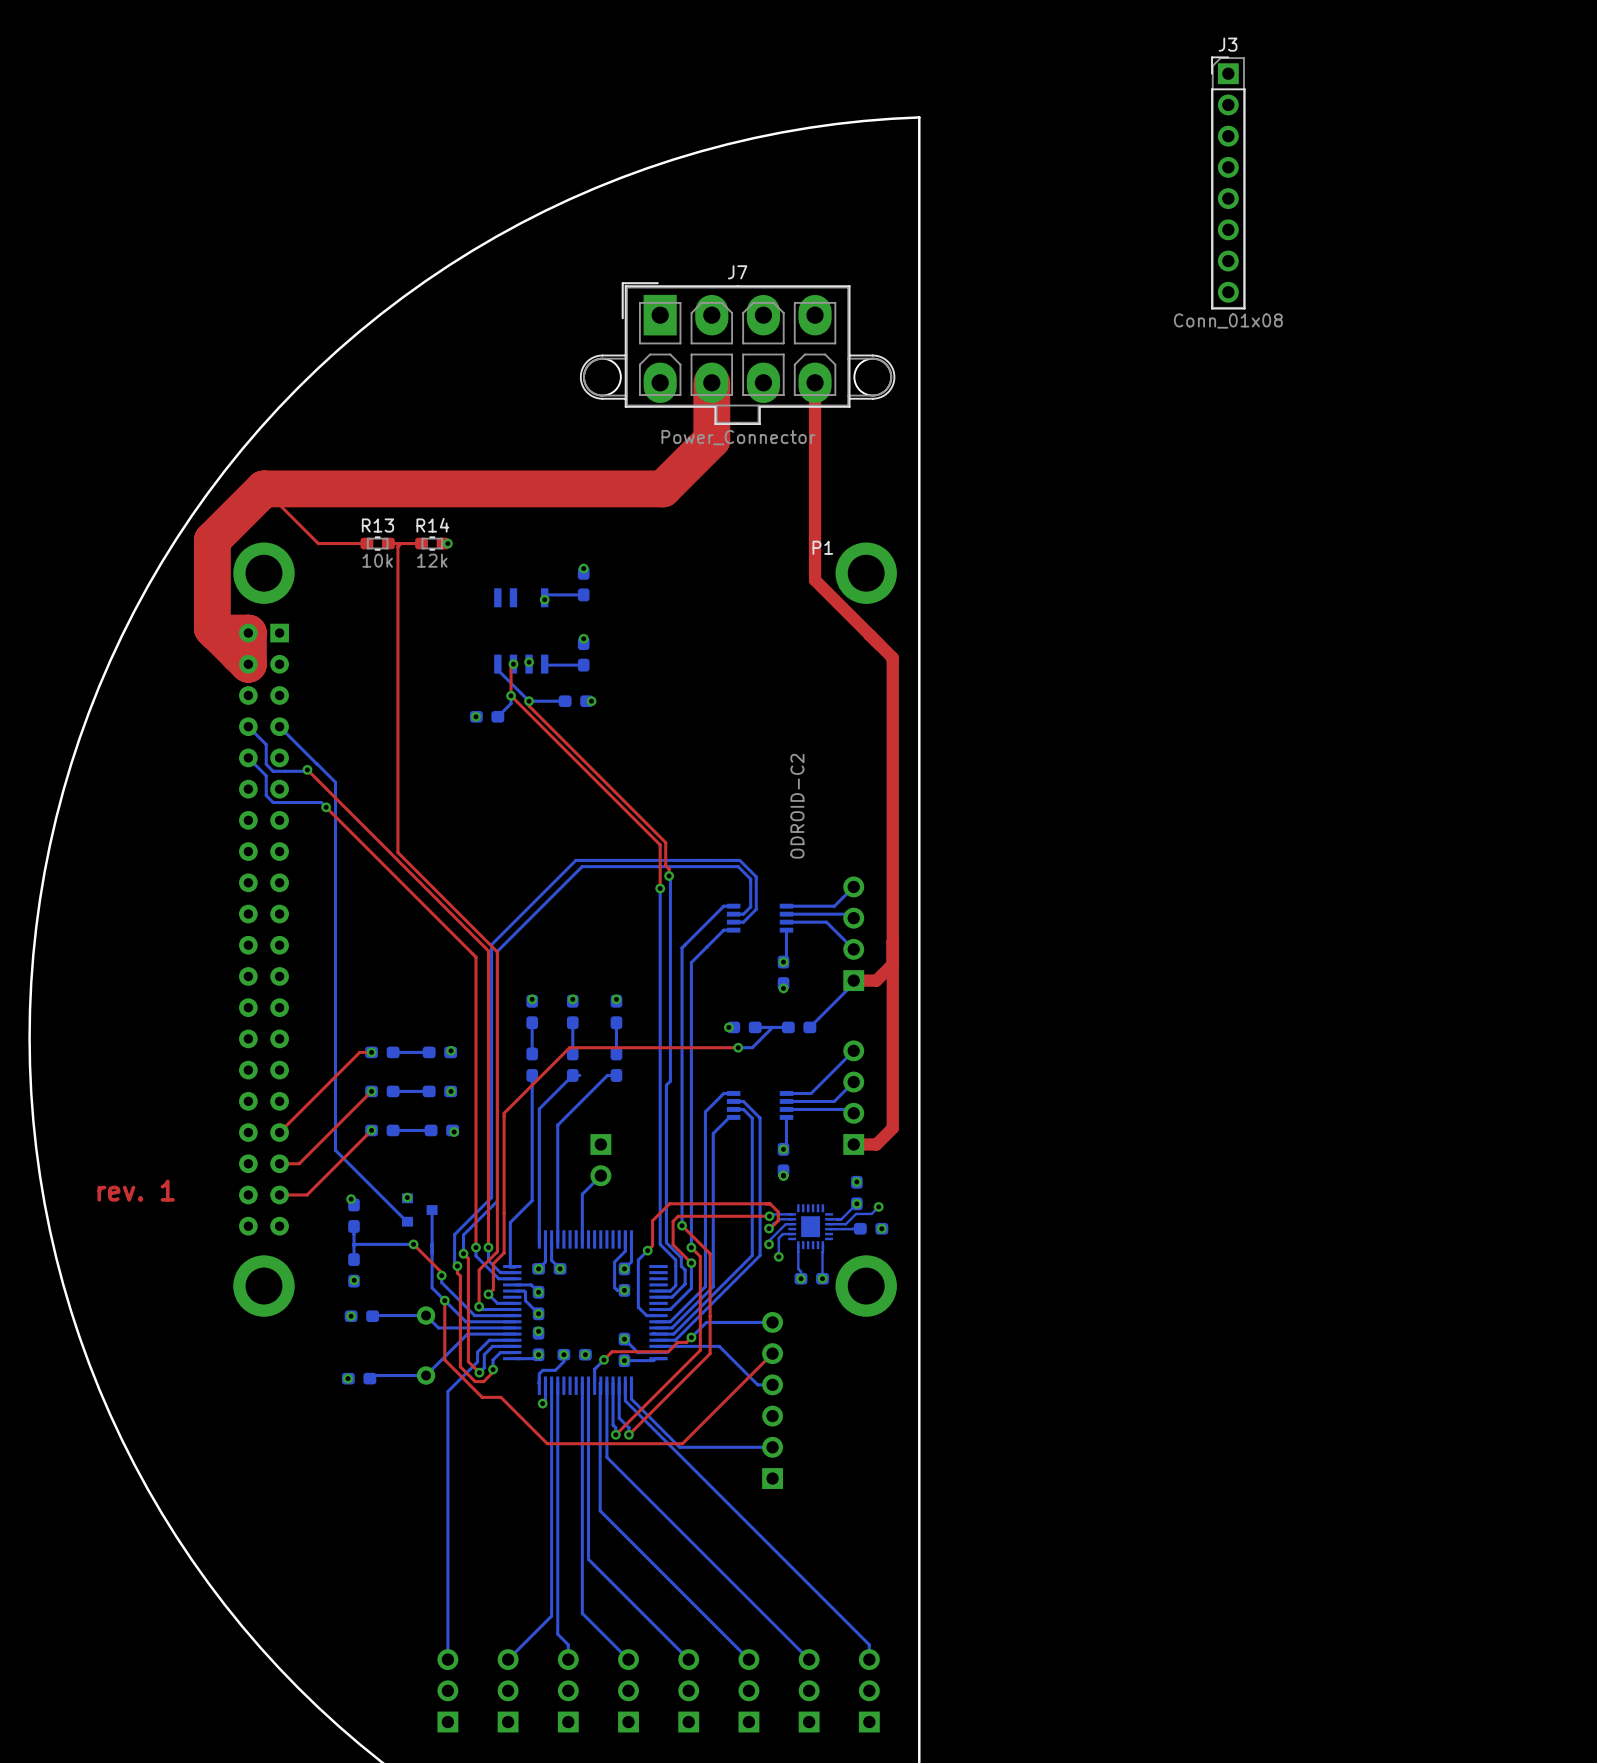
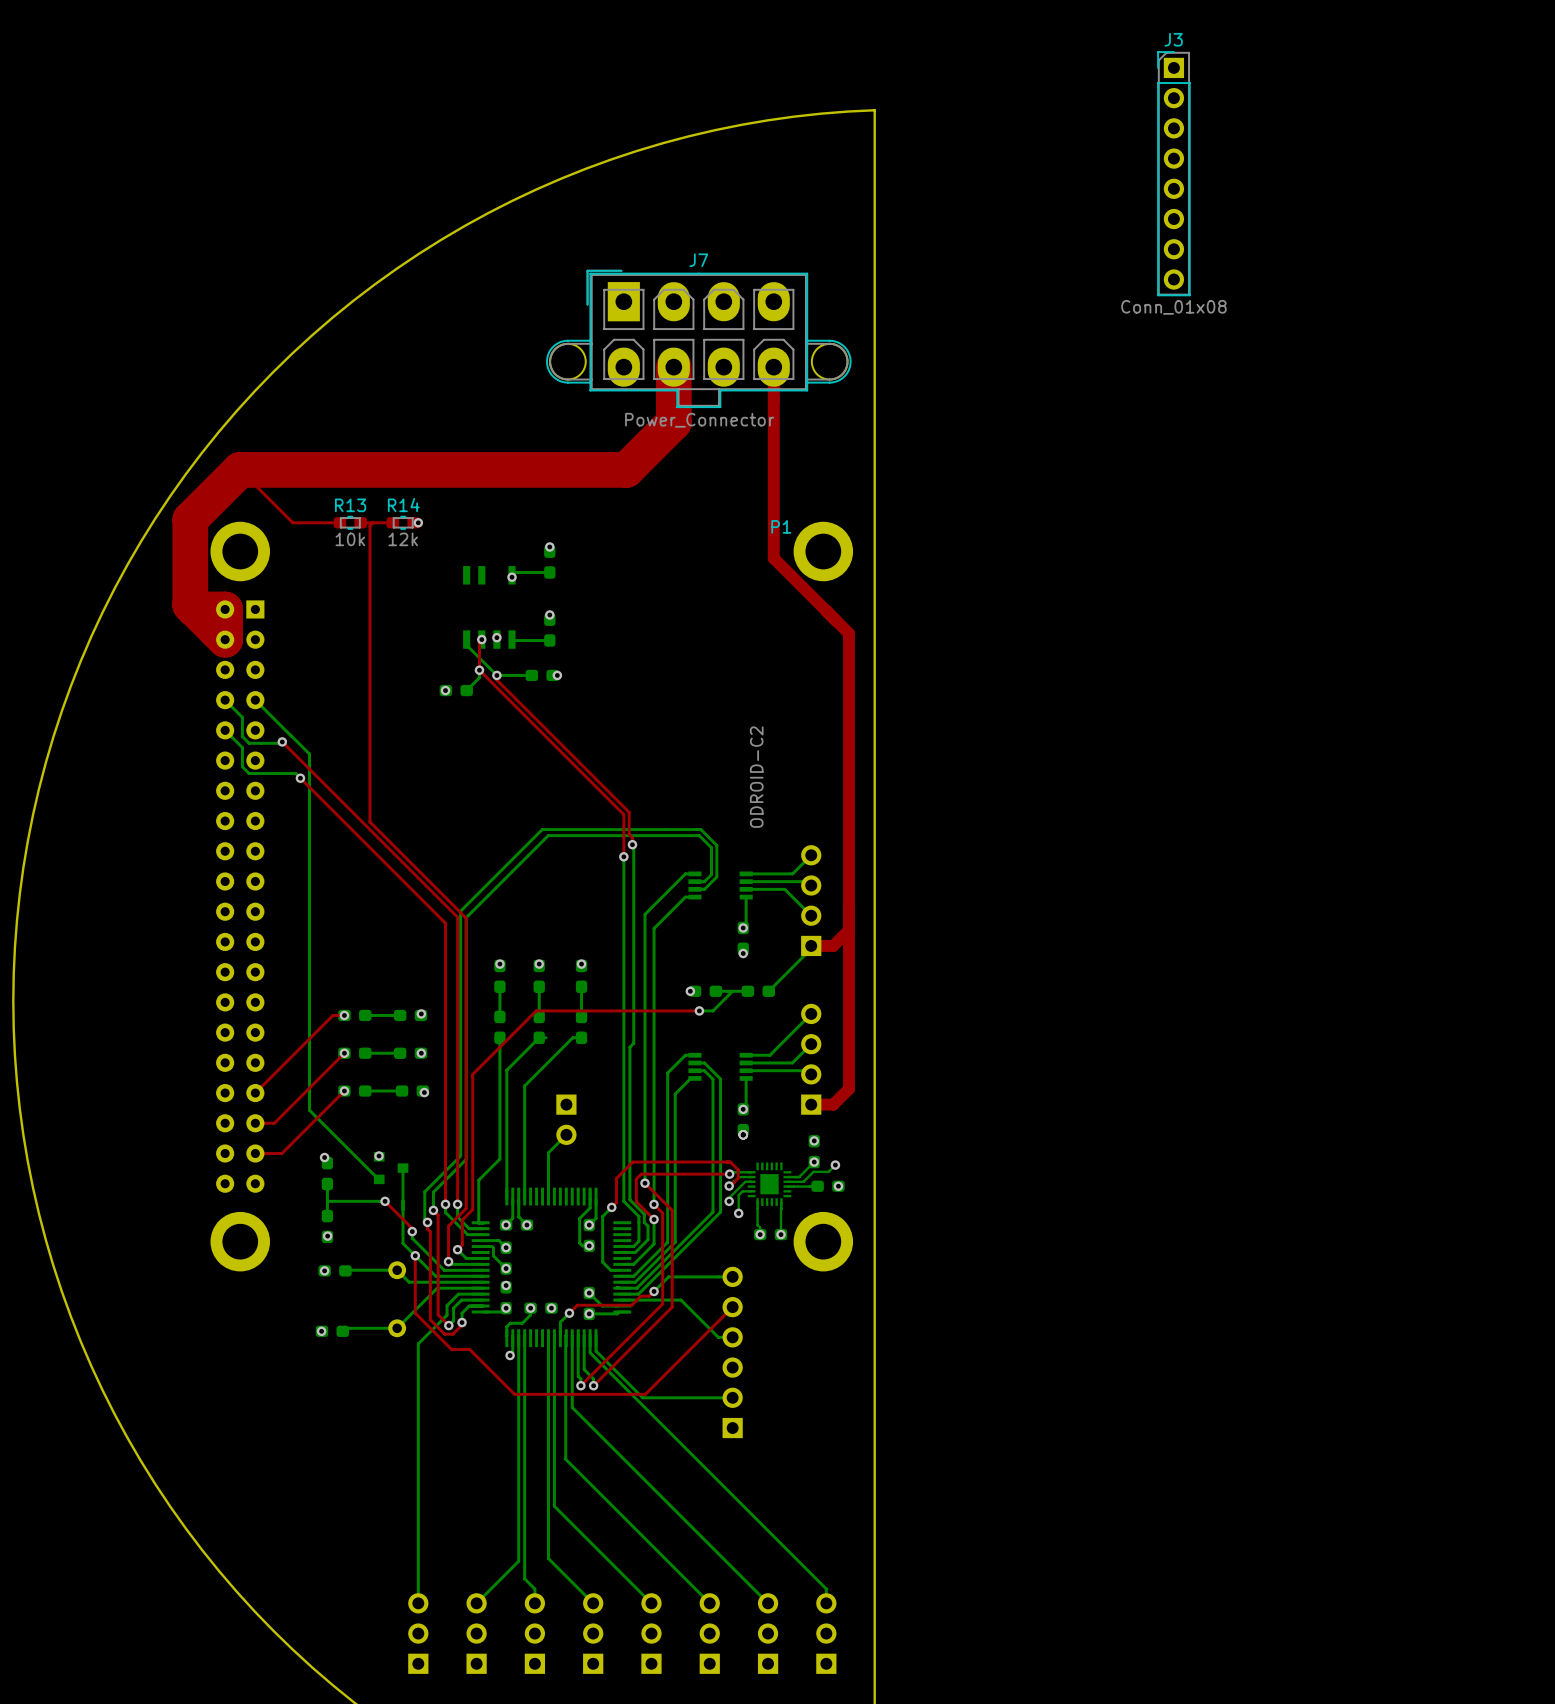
text: rev. 1 (136, 1190) -> none

